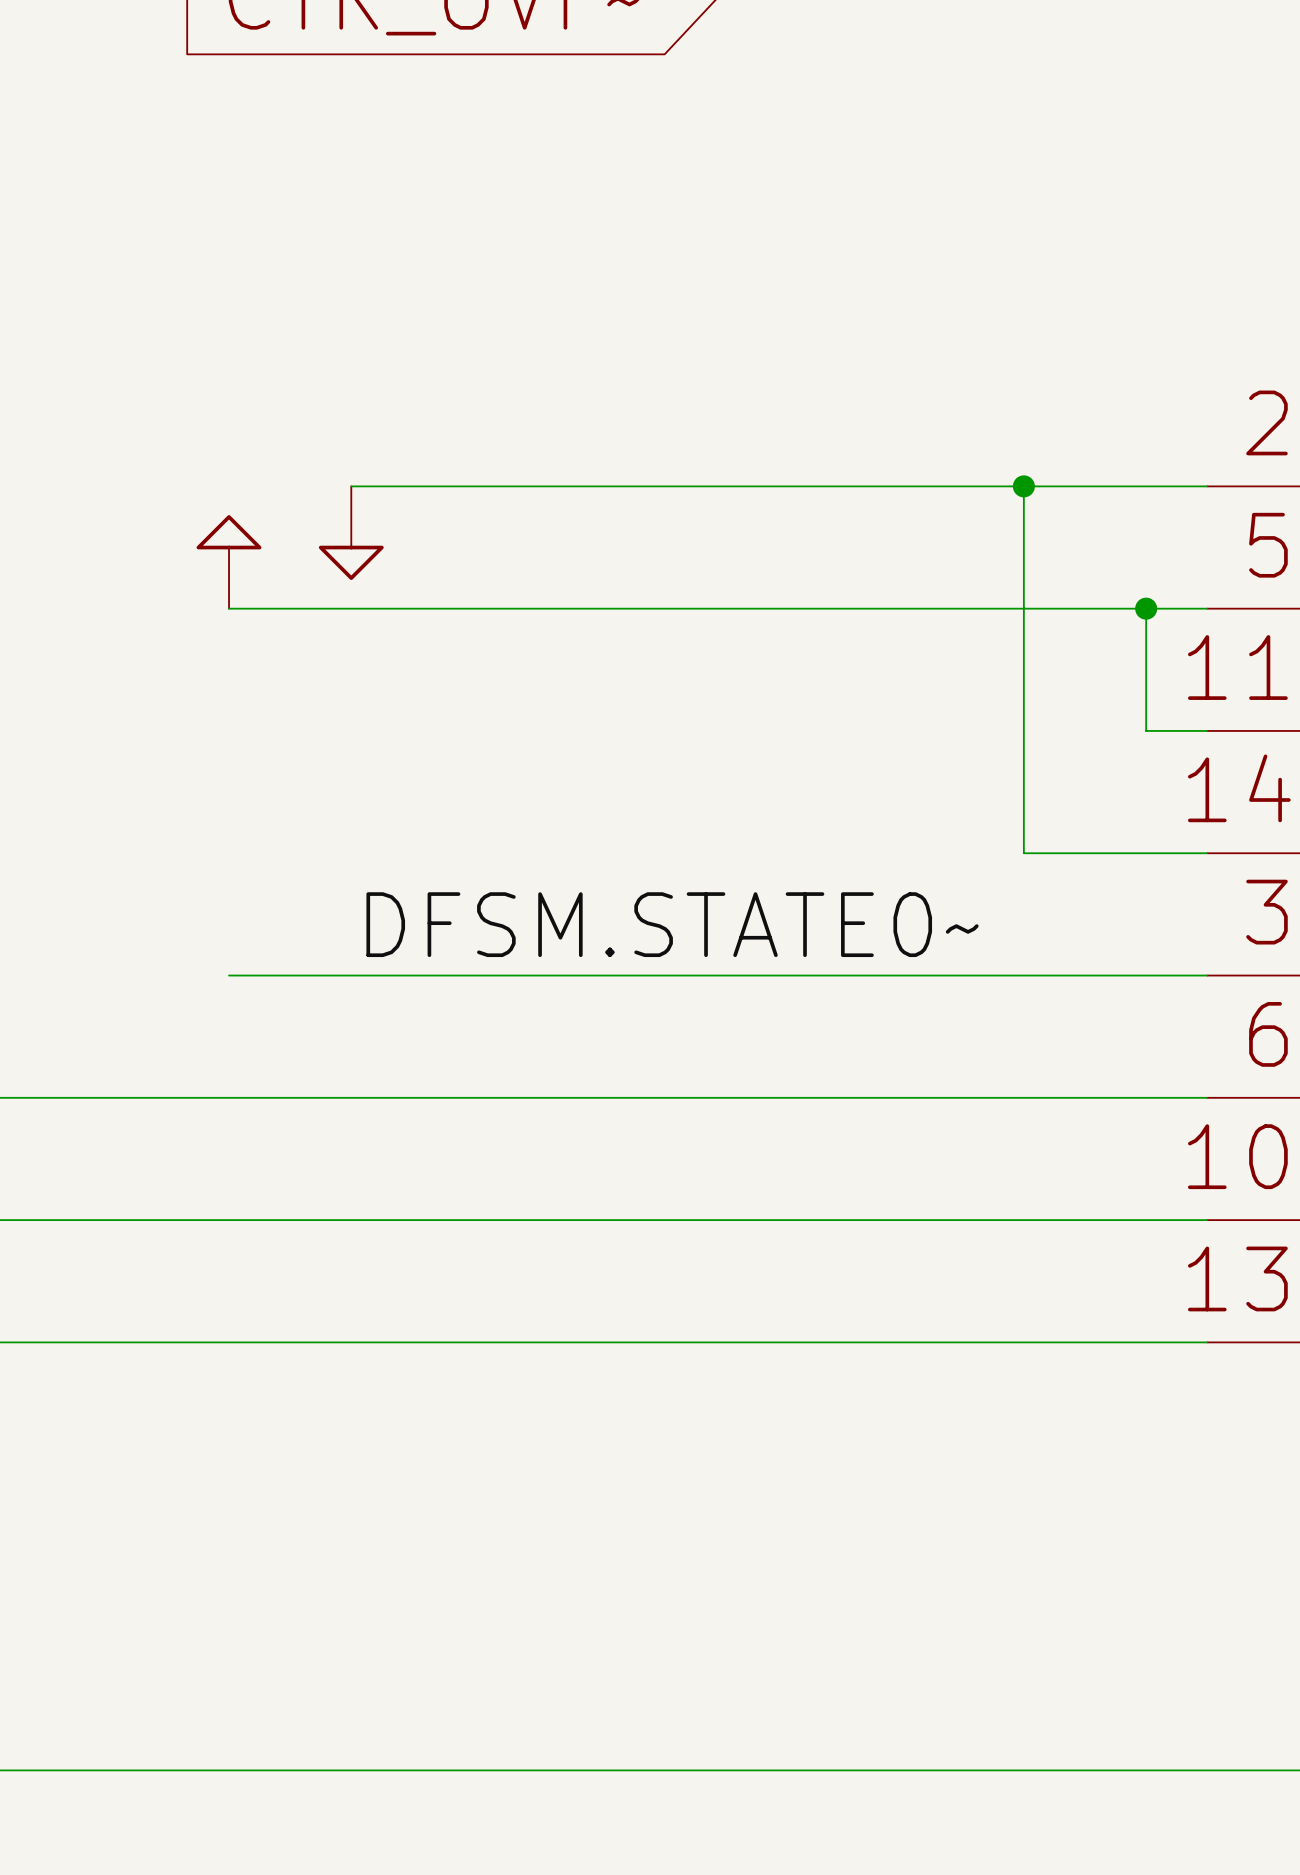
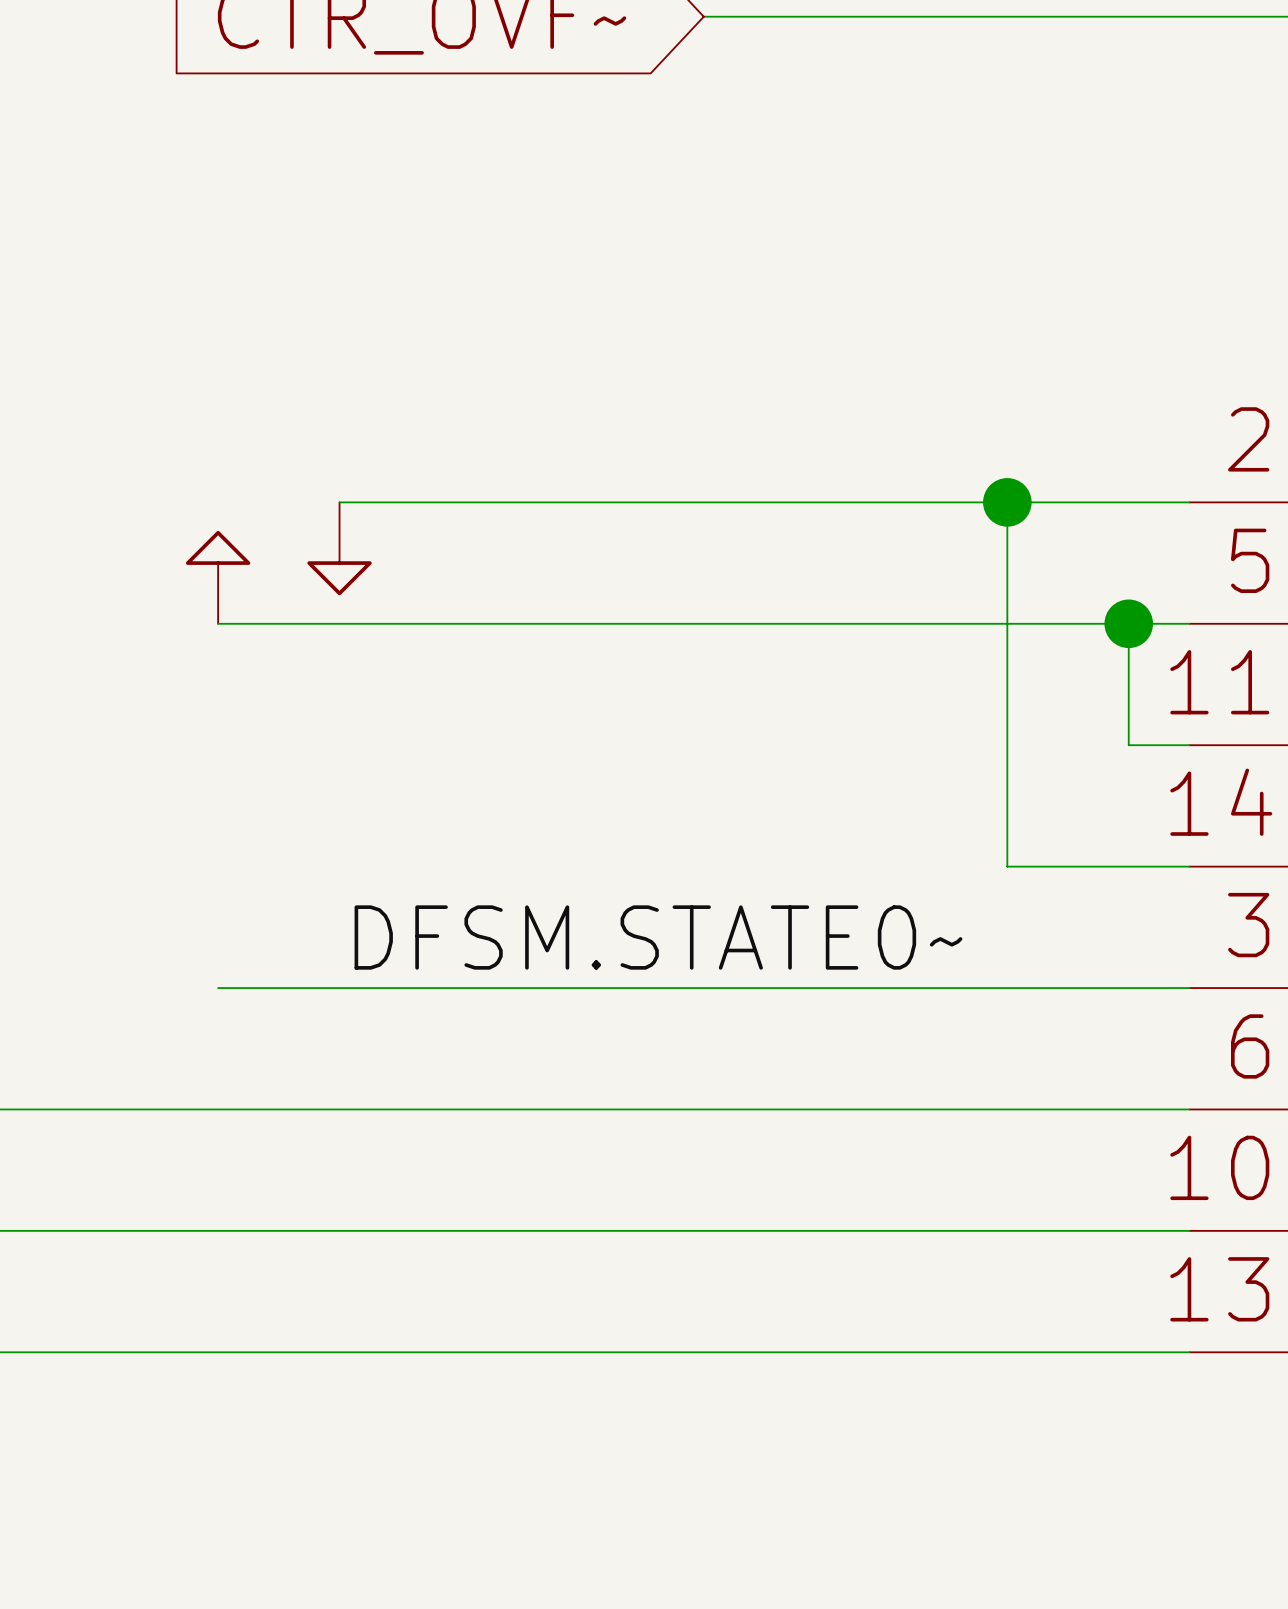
junction size: [1012, 475, 1035, 498] -> [983, 478, 1032, 527]
junction size: [1135, 597, 1158, 620] -> [1104, 599, 1154, 649]

